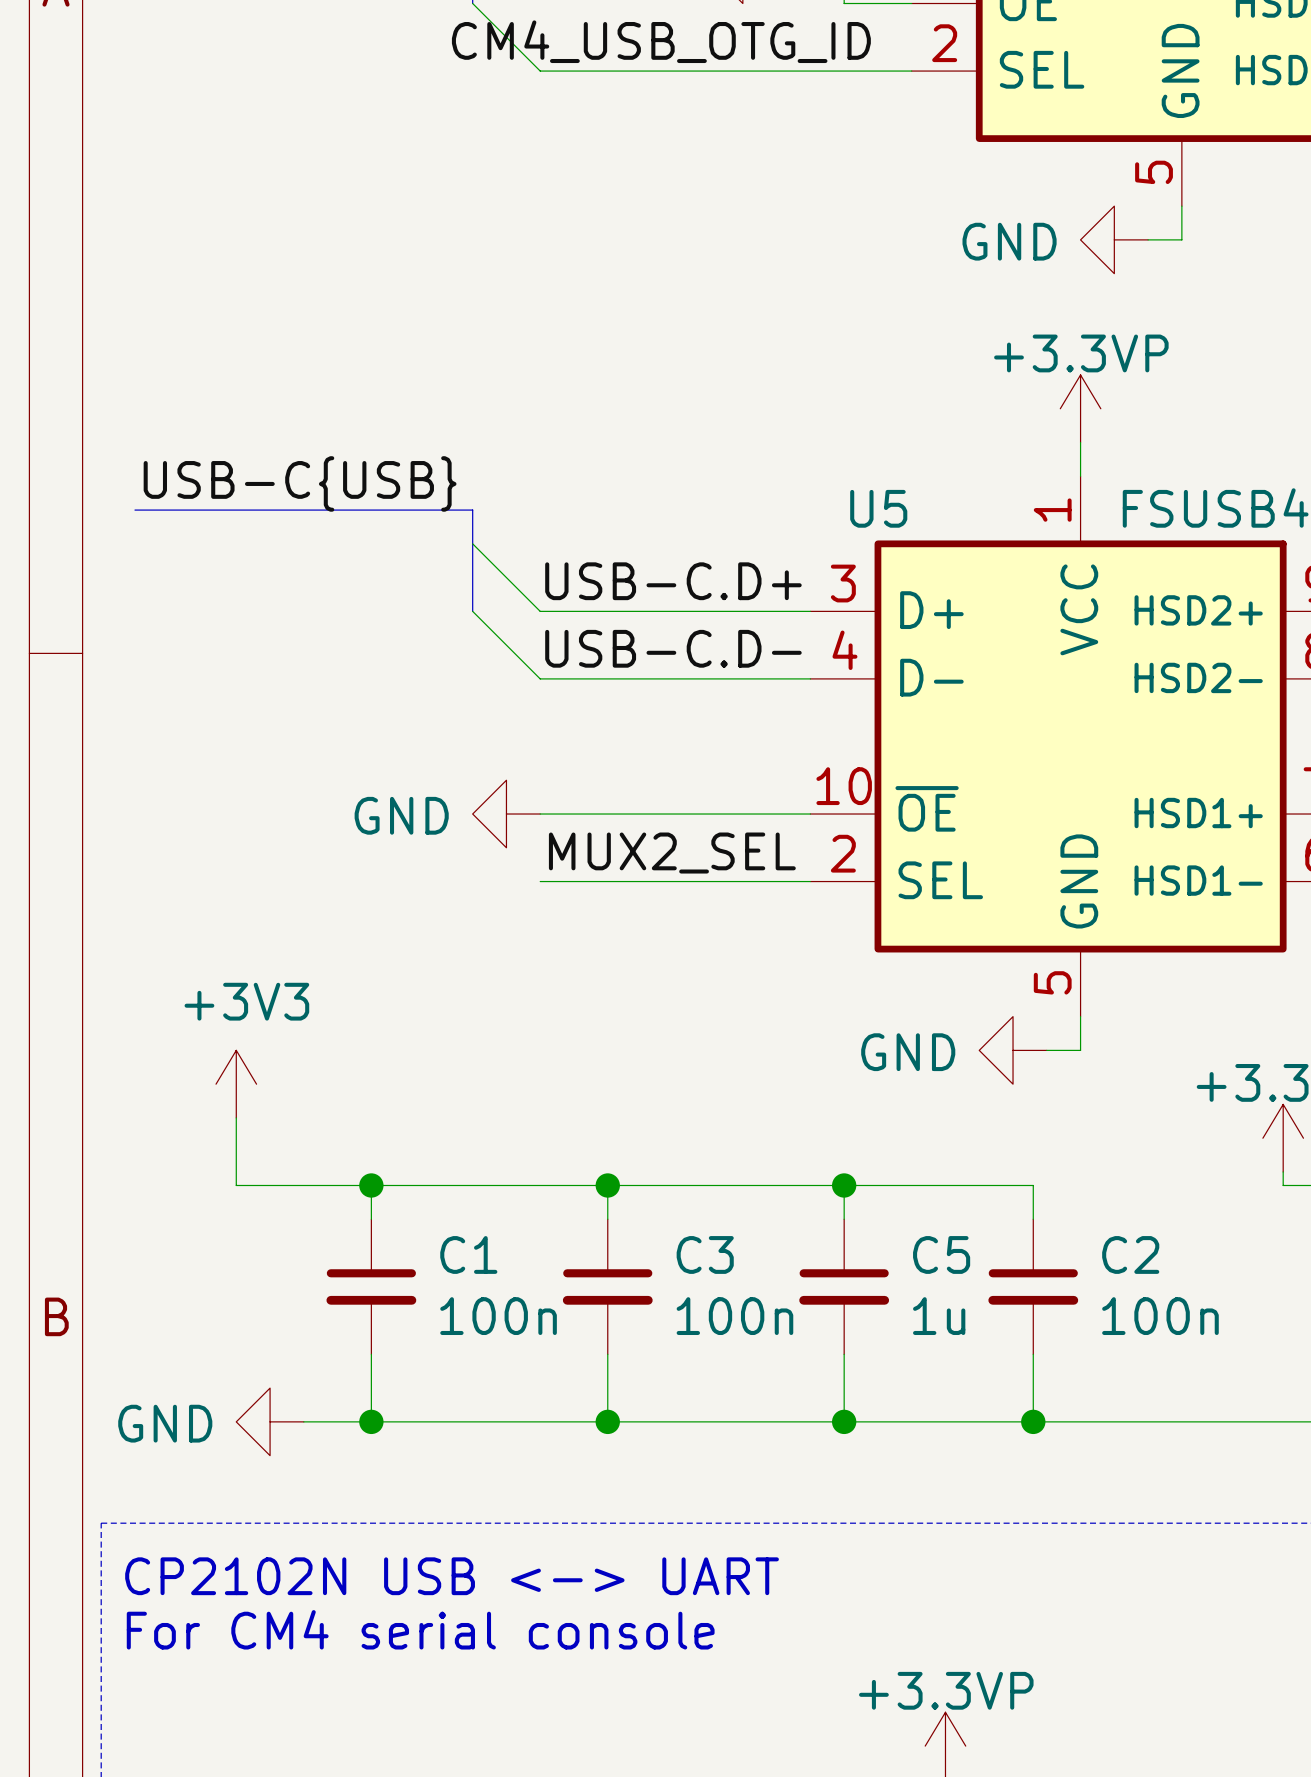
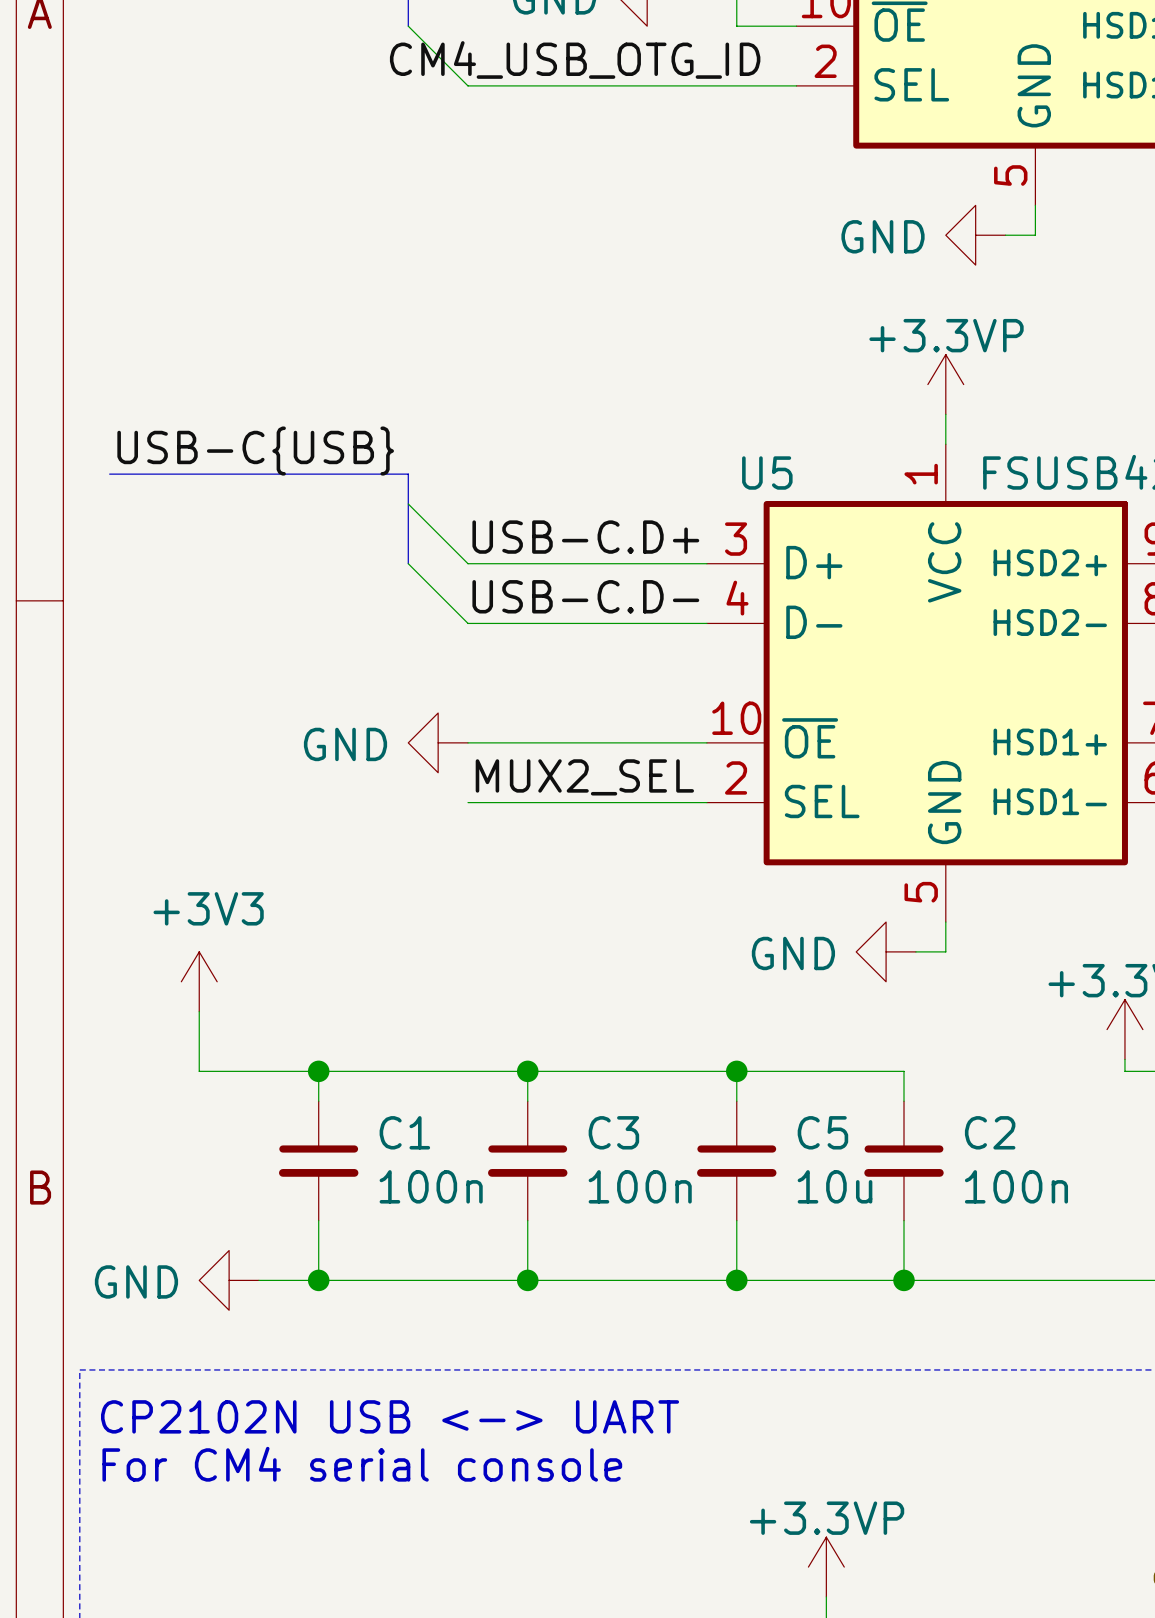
C5 value: 1u (939, 1316) -> 10u (835, 1186)

